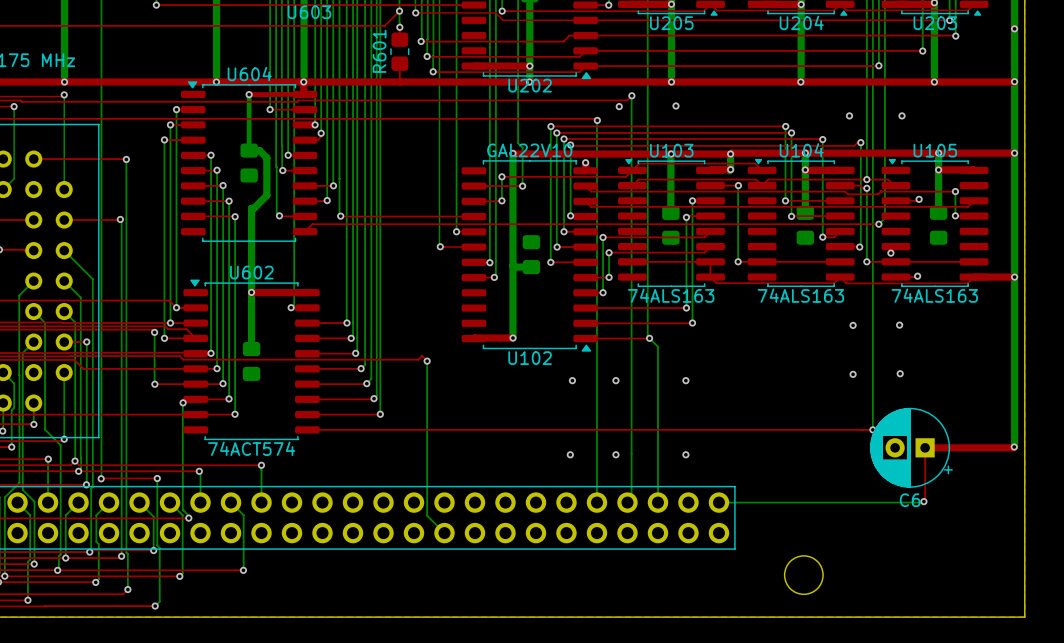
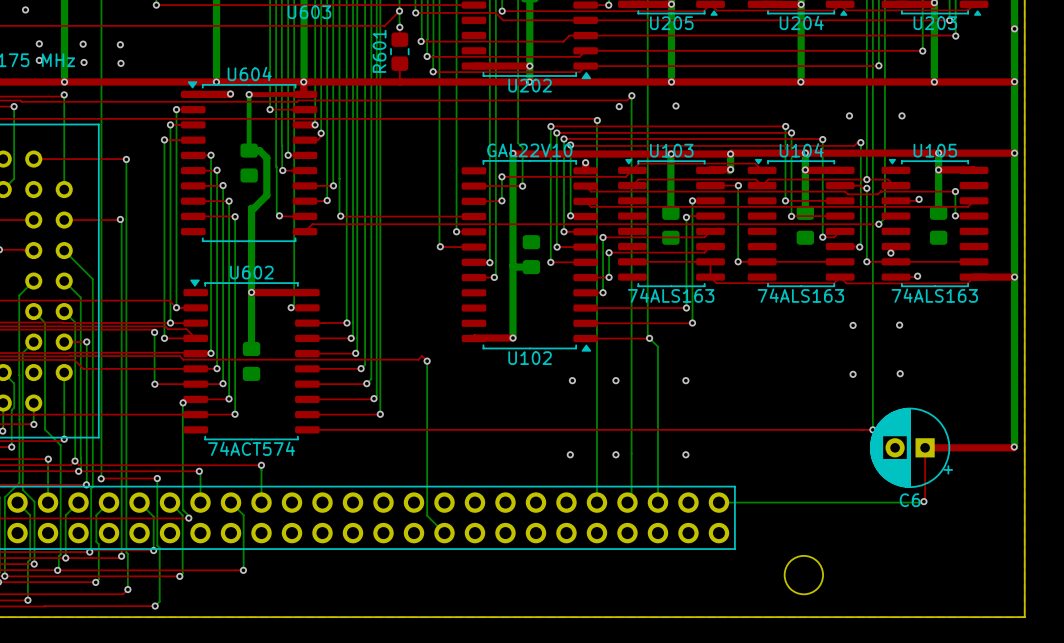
via: none -> (25, 9)
via: none -> (39, 43)
via: none -> (83, 44)
via: none -> (120, 44)
via: none -> (39, 60)
via: none -> (84, 62)
via: none -> (120, 63)
top track: none -> (230, 93) (193, 94)
via: none -> (230, 93)

